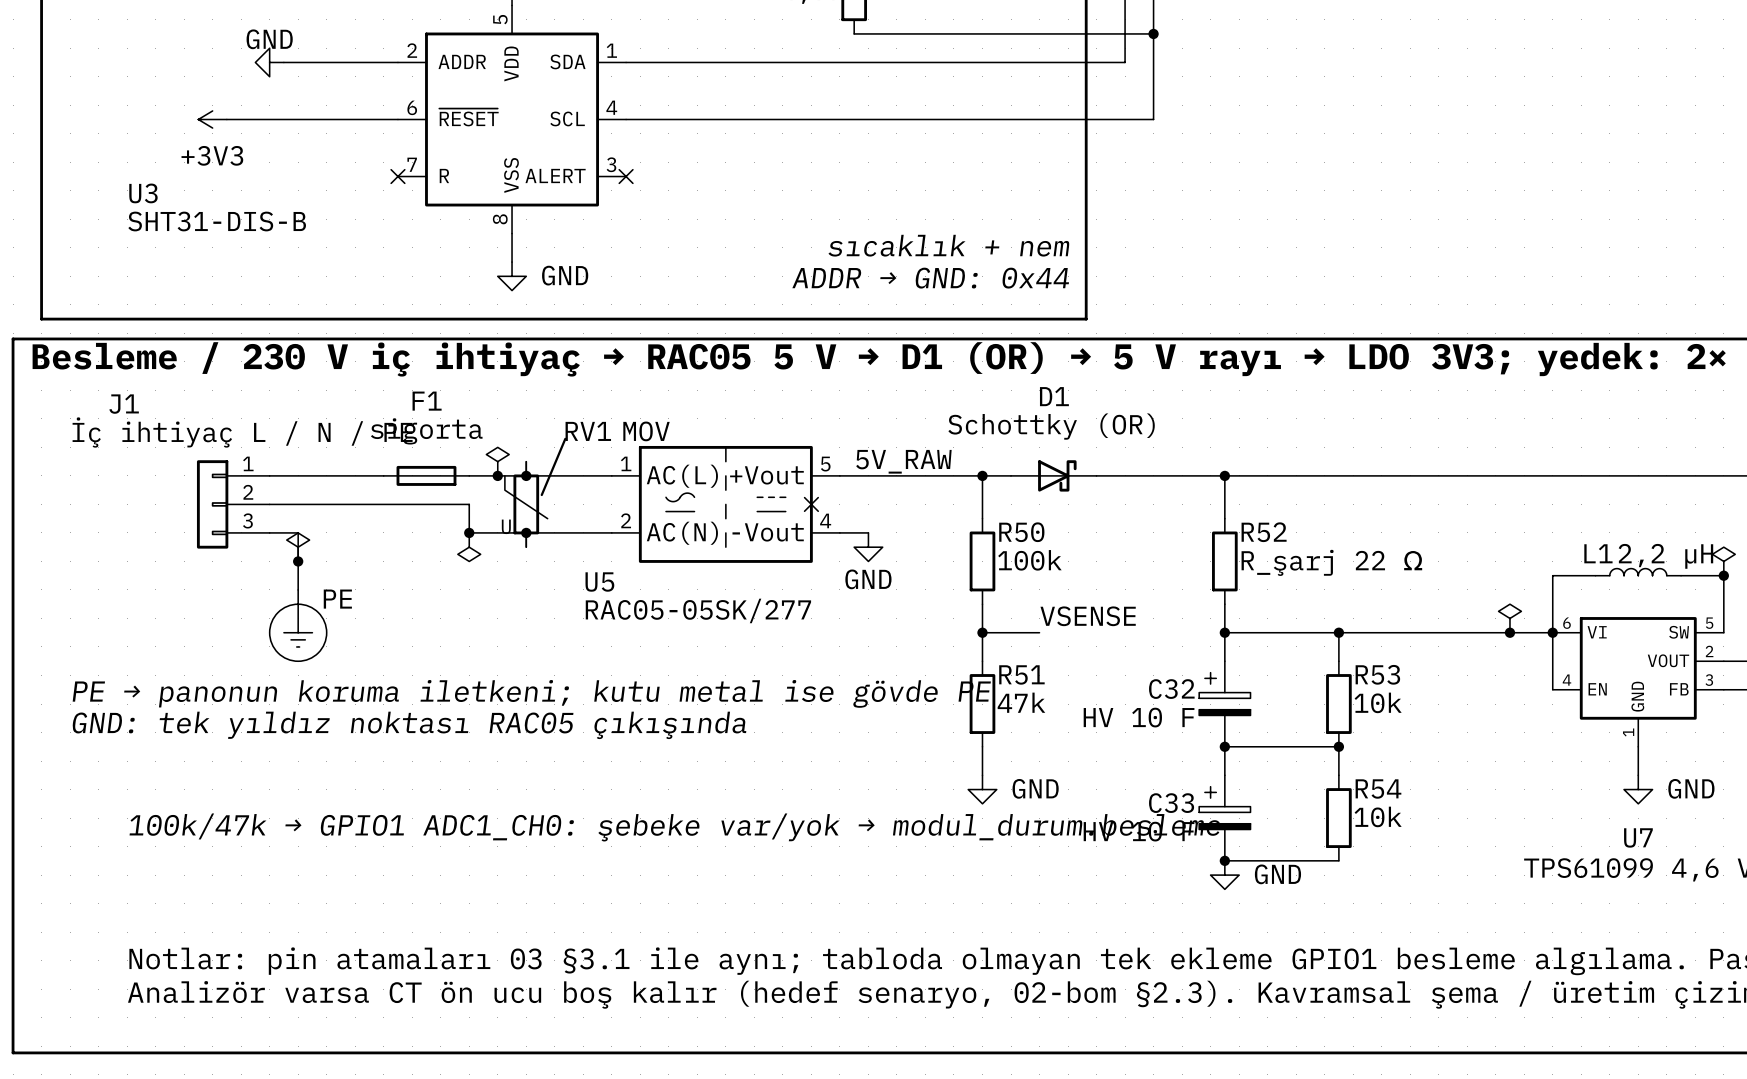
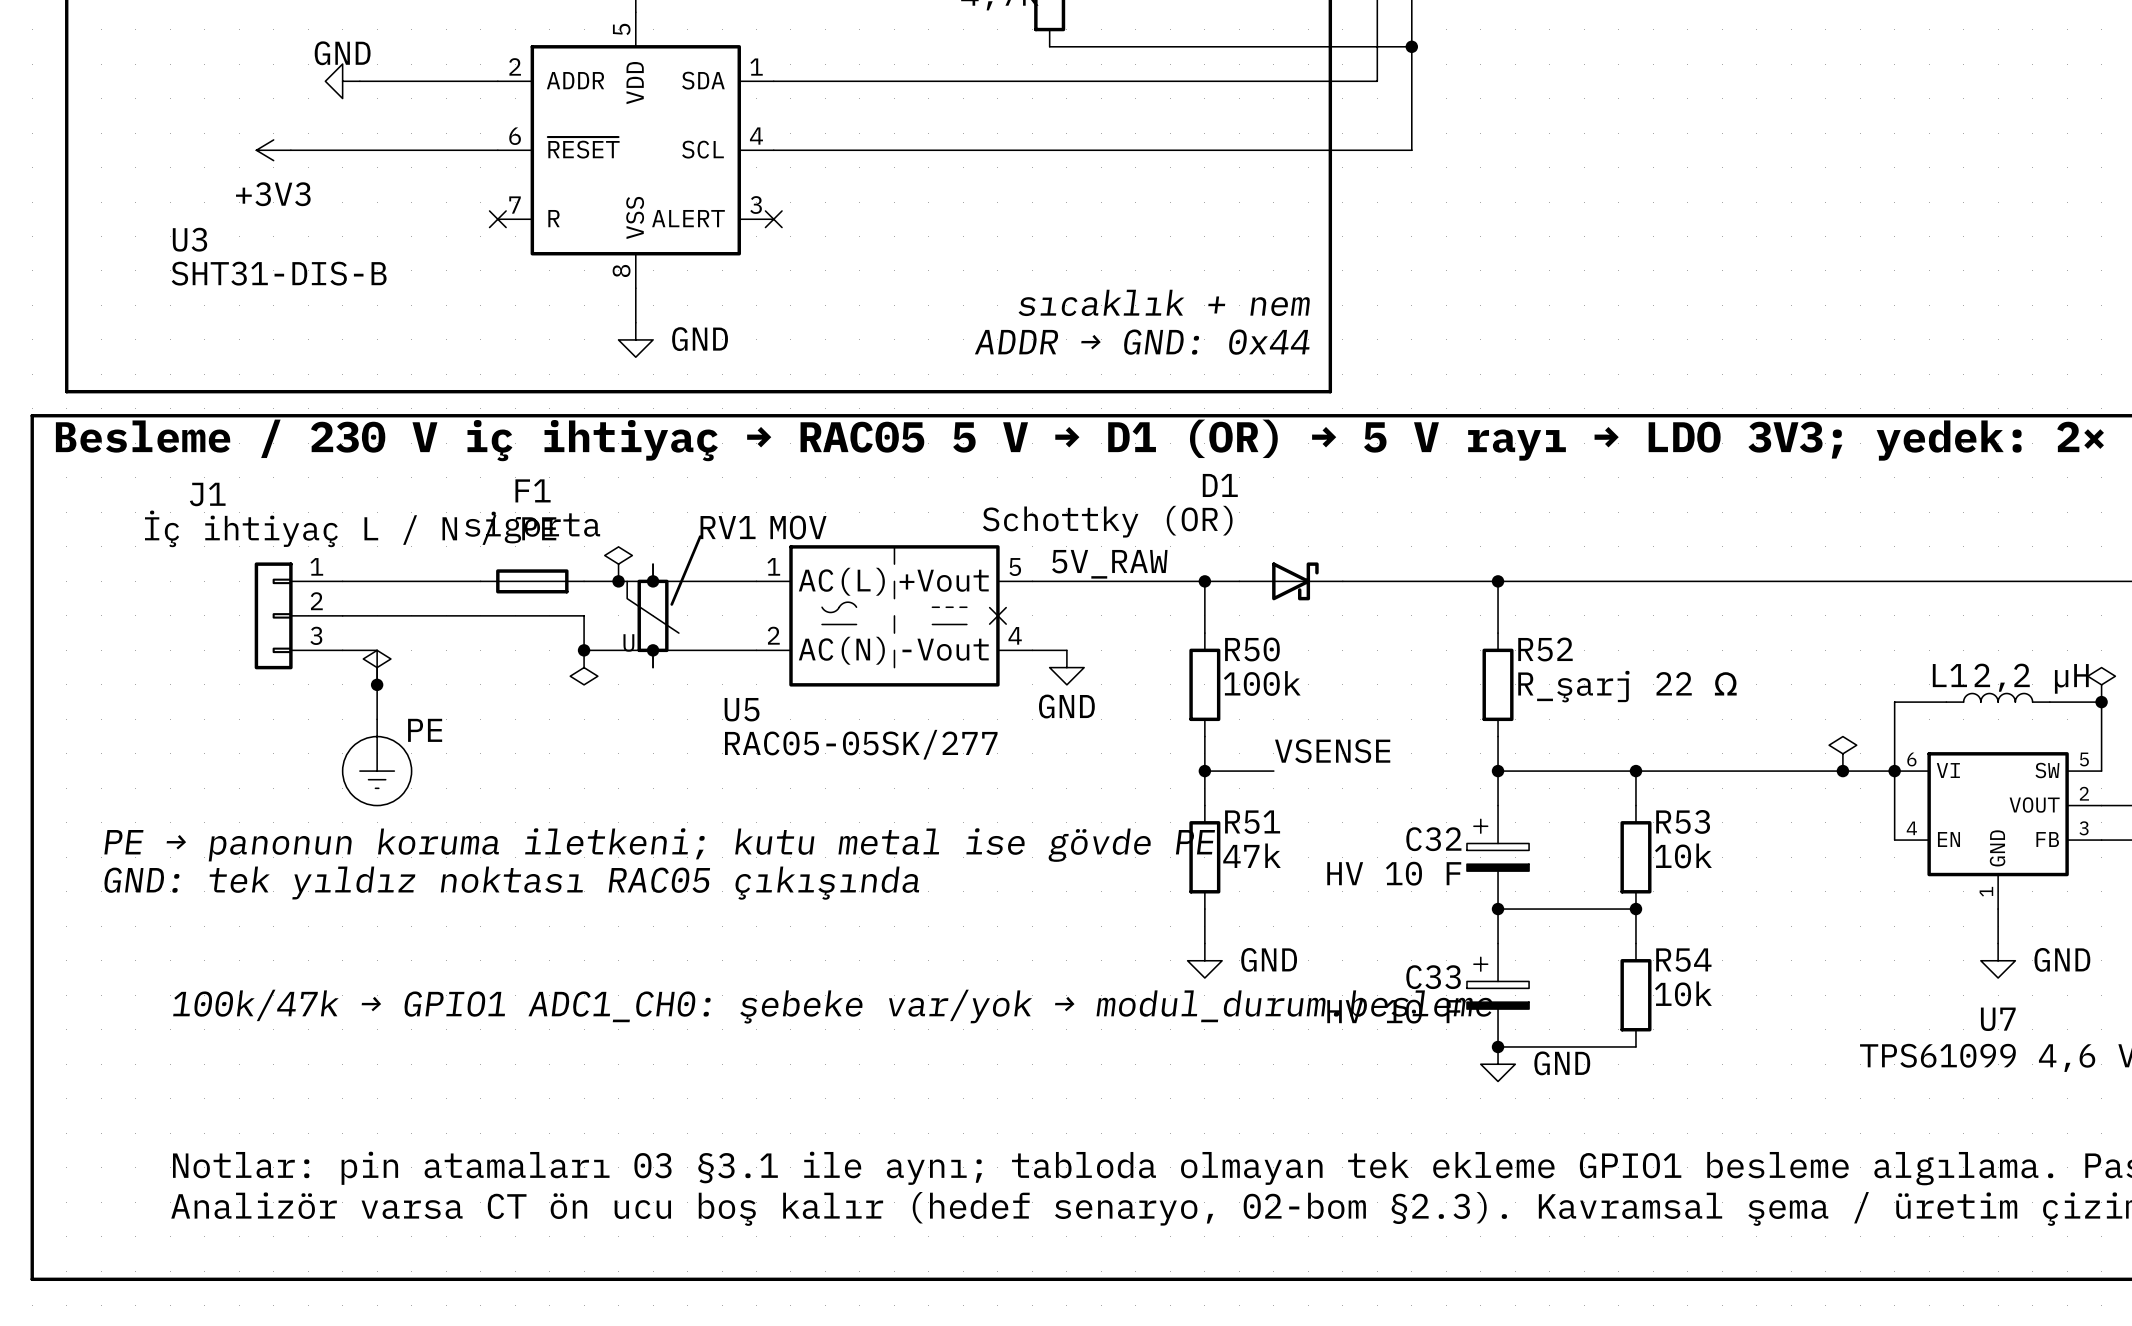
D1 name position: D1 (1054, 396) -> D1 (1220, 485)
J1 name position: J1 (124, 404) -> J1 (207, 494)
D1 value position: Schottky (OR) (1051, 426) -> Schottky (OR) (1107, 521)
J1 value position: İç ihtiyaç L / N / PE (242, 432) -> İç ihtiyaç L / N / PE (350, 528)

